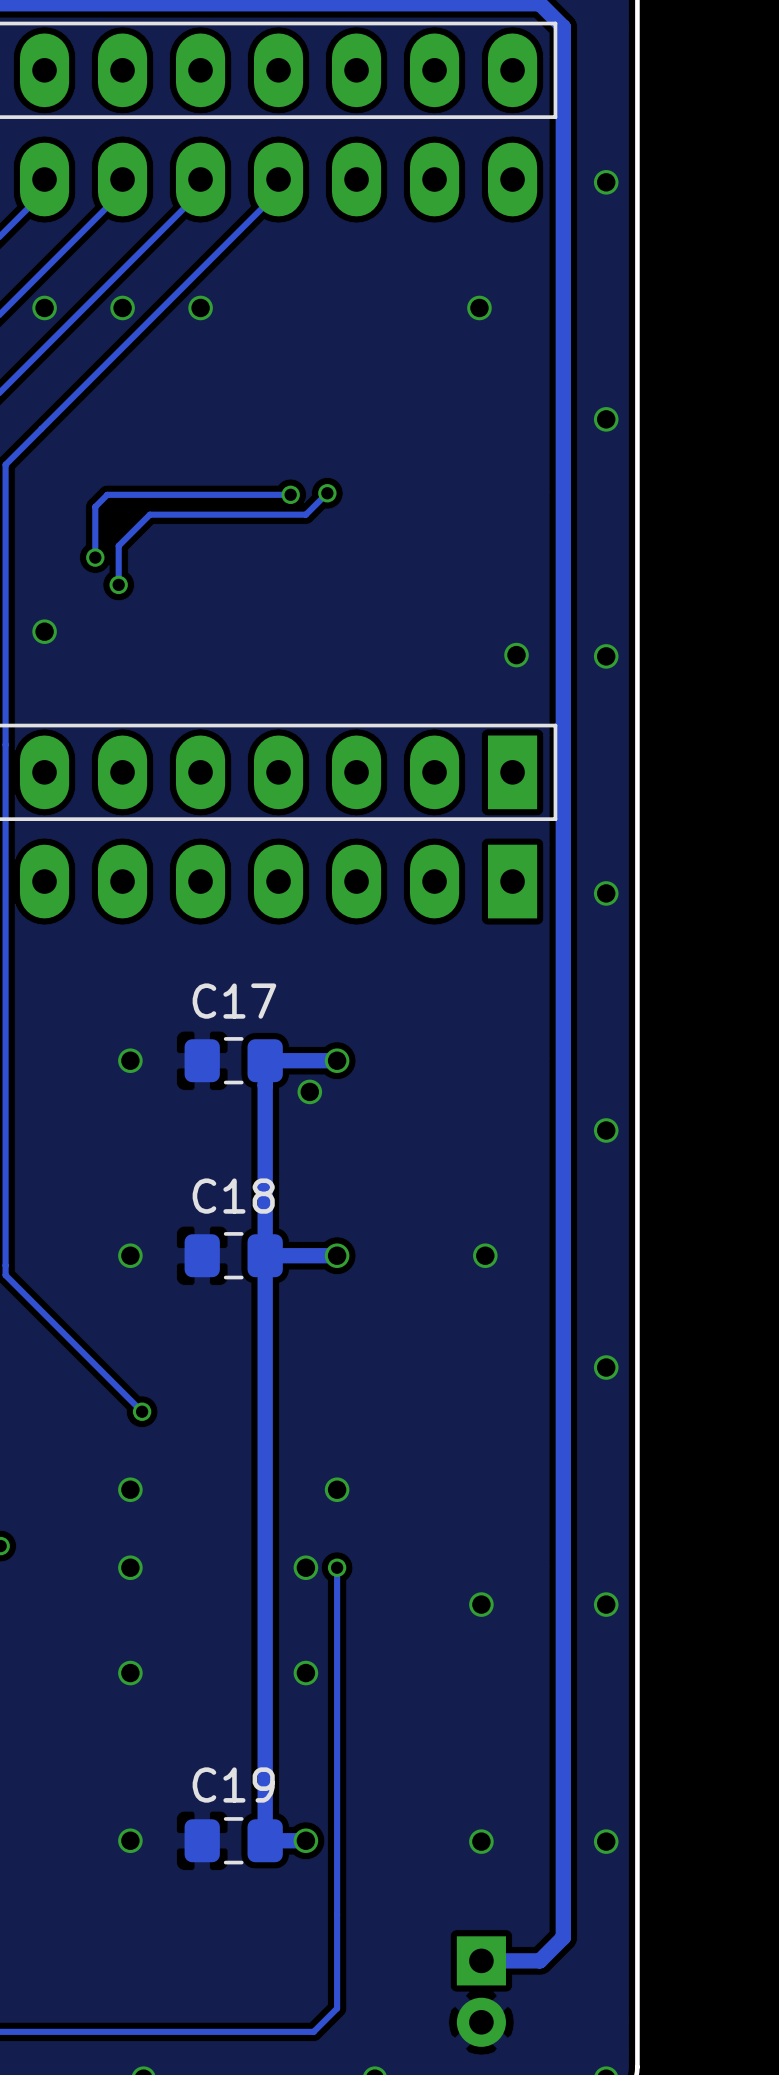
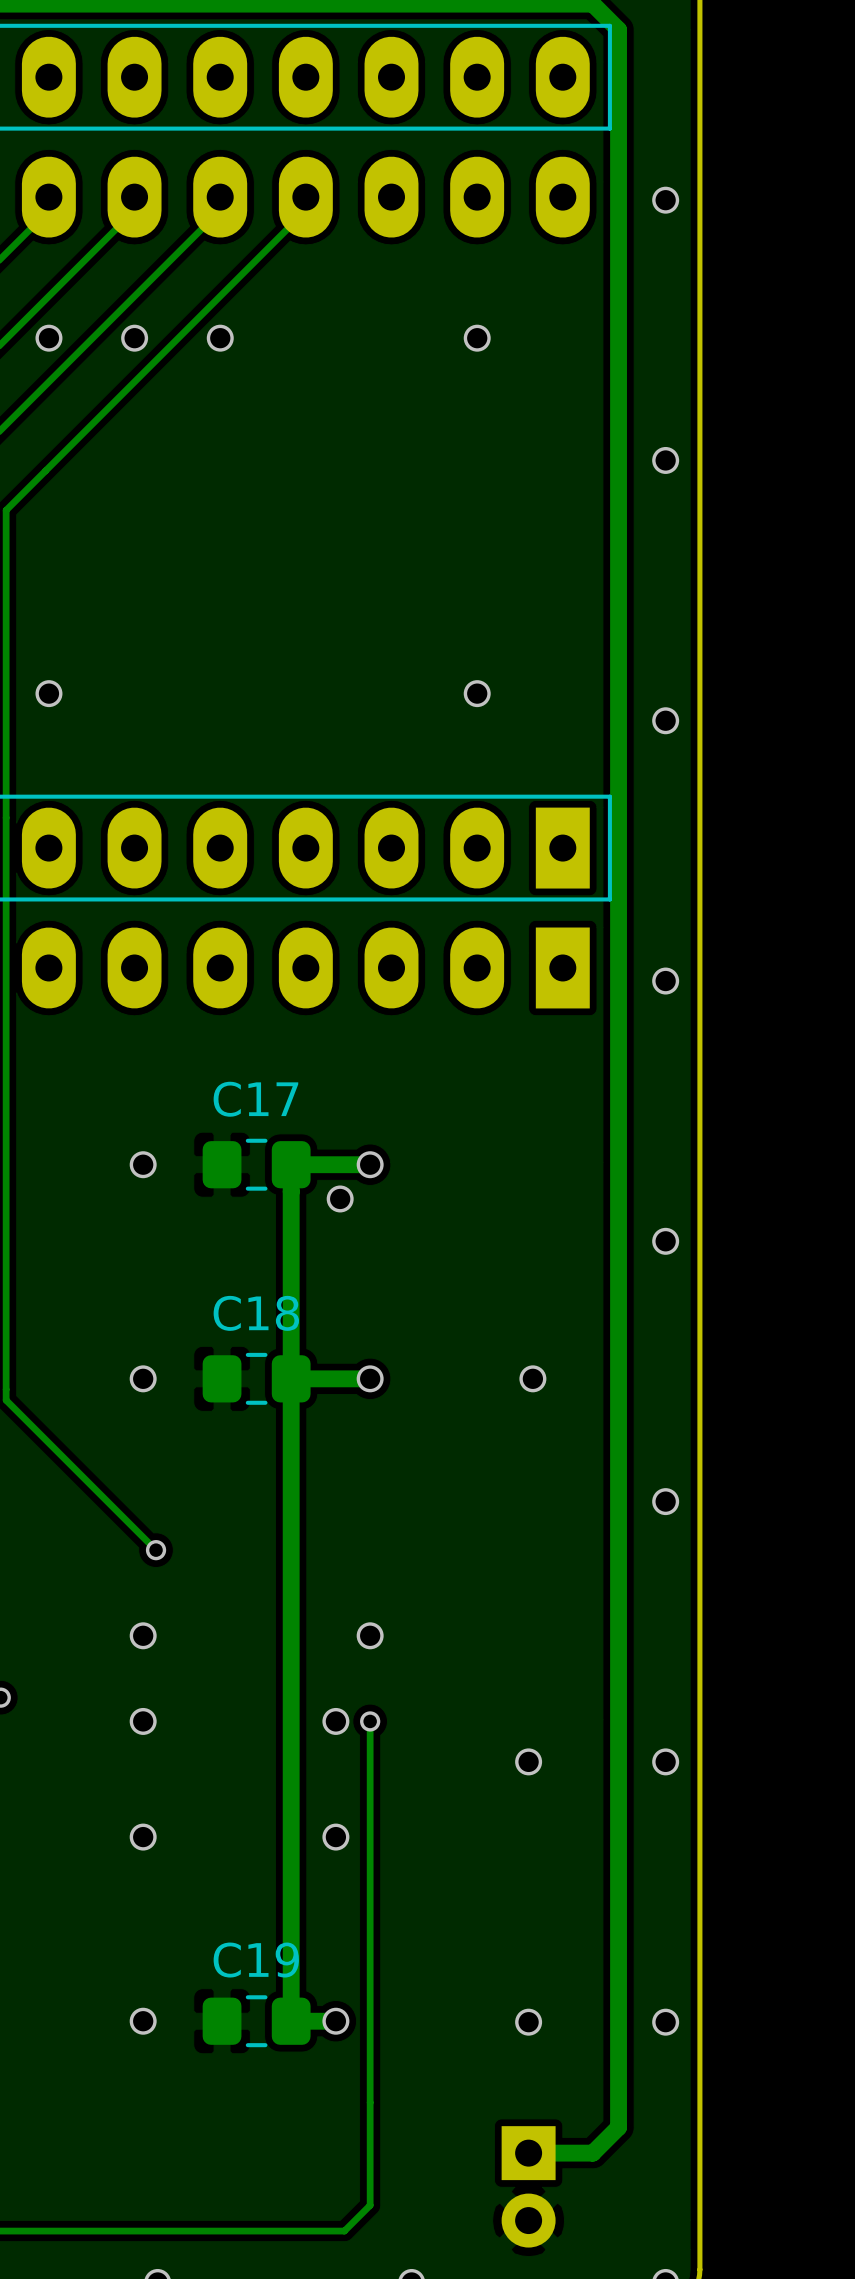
via position: (479, 307) -> (477, 338)
track: (327, 493) (305, 514) (149, 514) (118, 545) (118, 584) -> none
via: (327, 493) -> none
track: (290, 494) (107, 494) (95, 506) (95, 557) -> none
via: (290, 494) -> none
via: (95, 557) -> none
via: (118, 584) -> none
via position: (516, 655) -> (477, 693)

